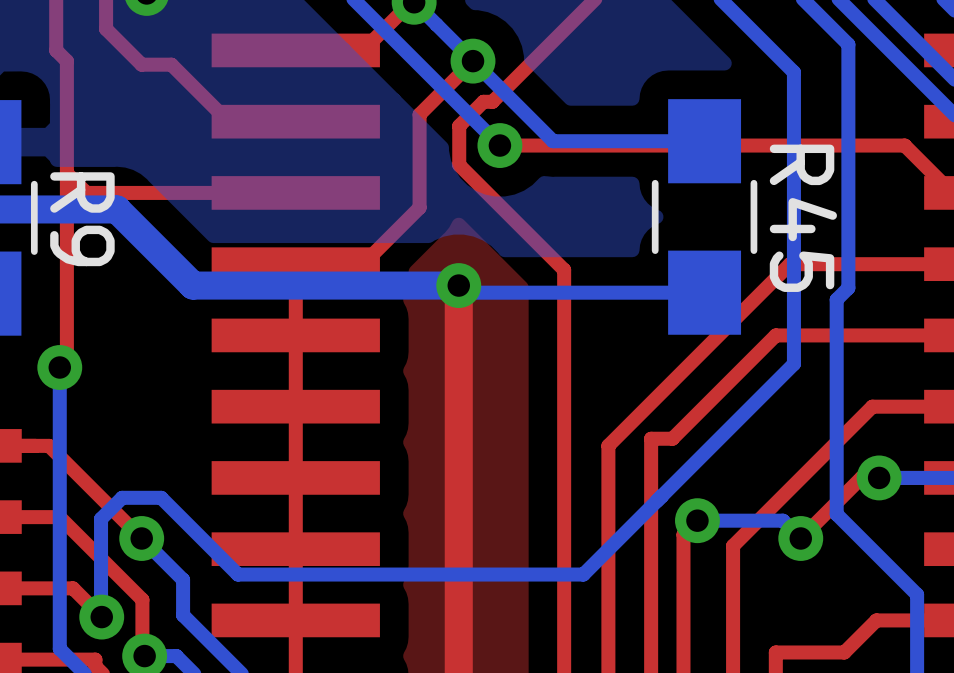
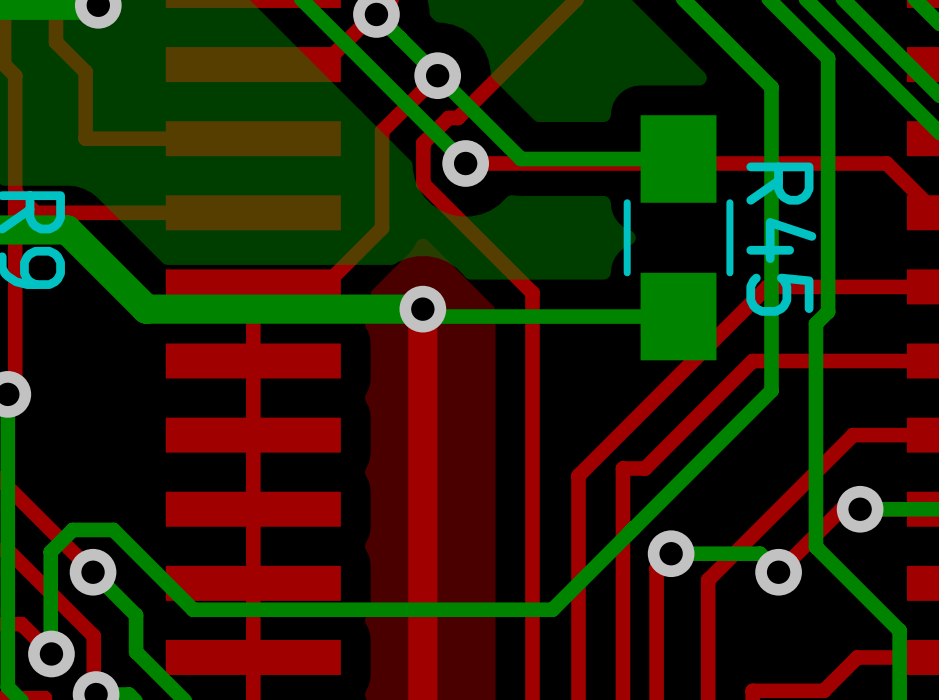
top track: (134, 57) (141, 64) (171, 64) (228, 121) -> (85, 71) (85, 138) (183, 138)

